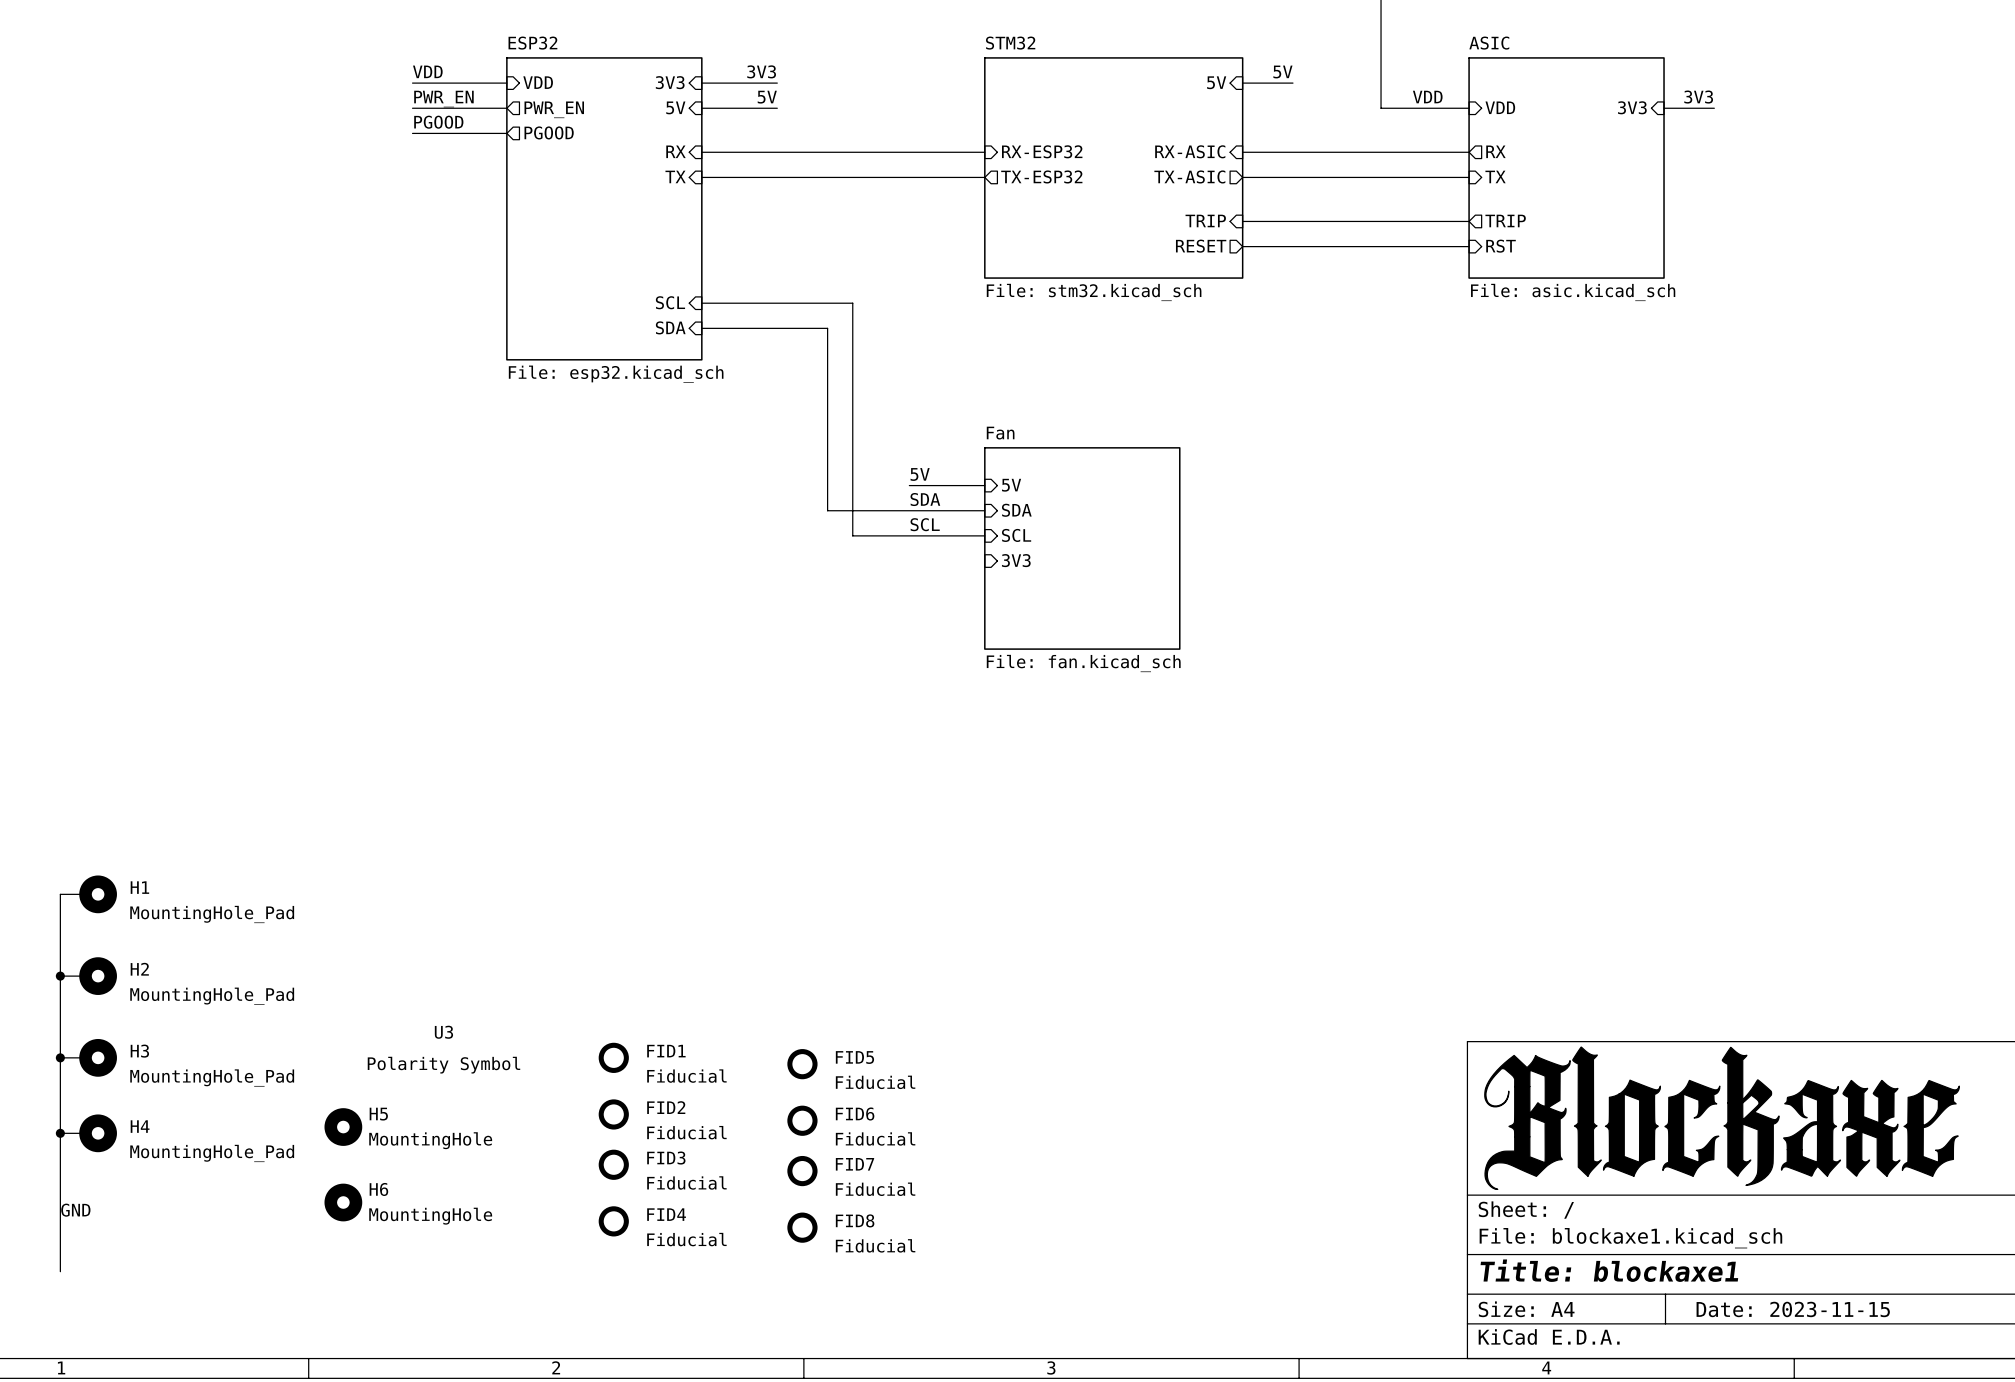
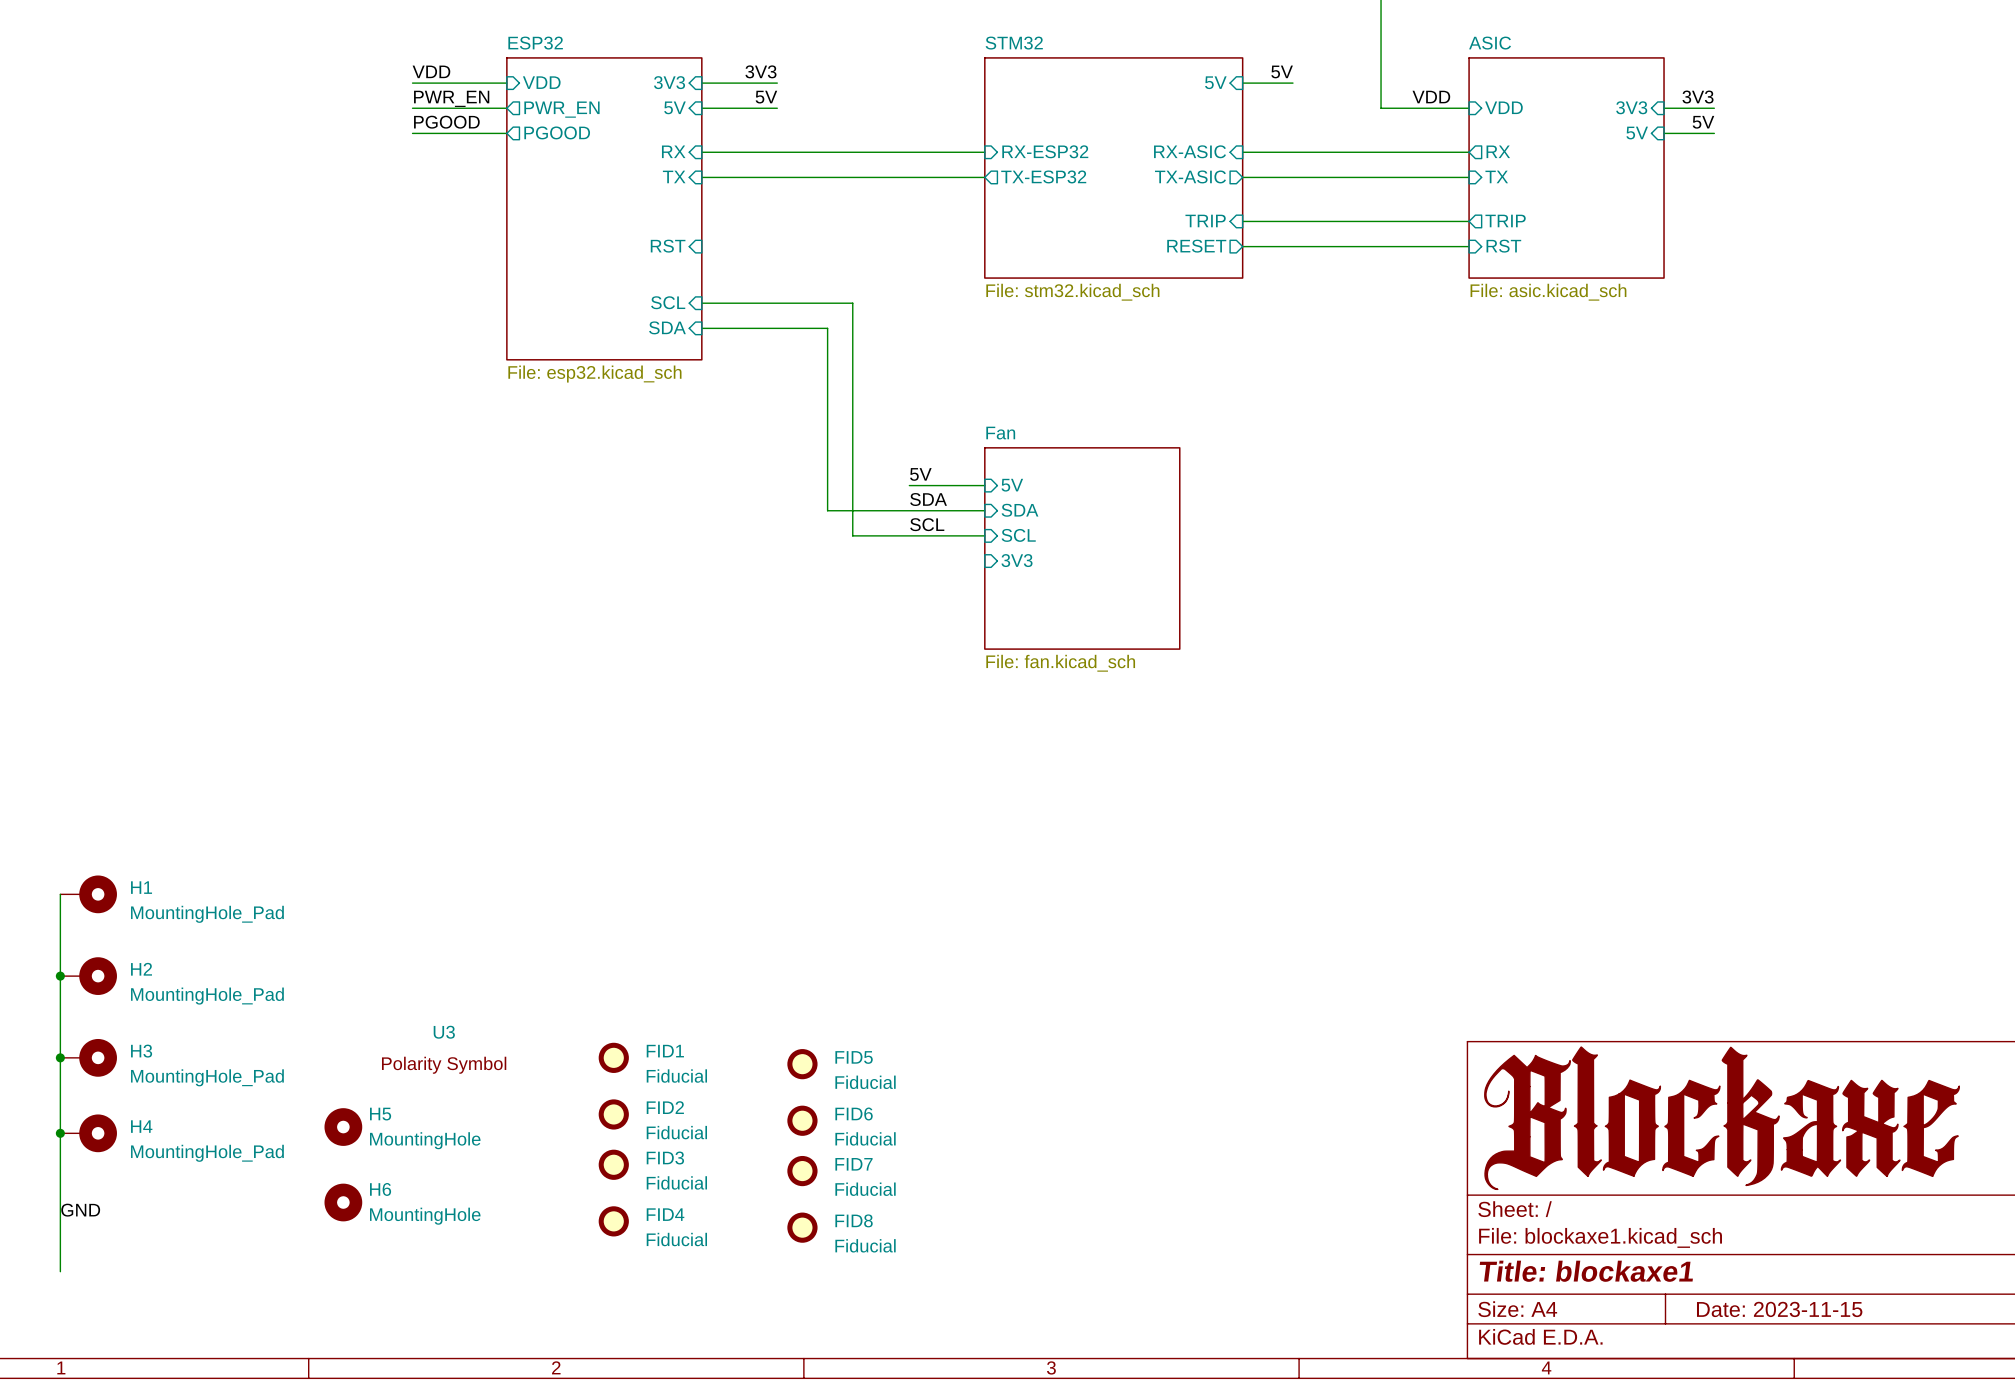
label: none -> 5V (1703, 122)
sheet pin: none -> 5V (1637, 133)
wire: none -> (1664, 133) (1714, 133)
sheet pin: none -> RST (668, 246)

